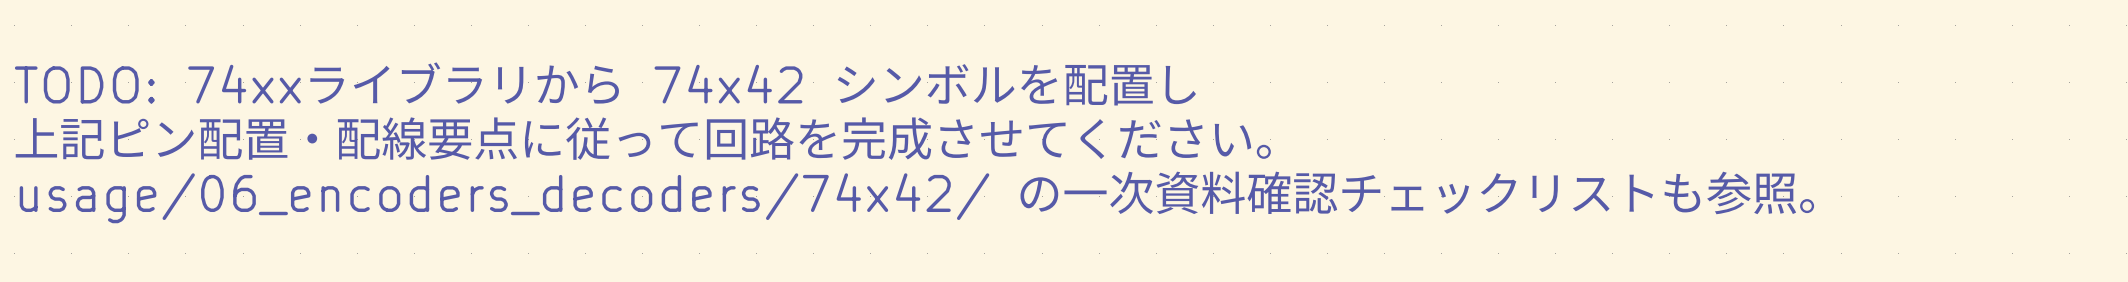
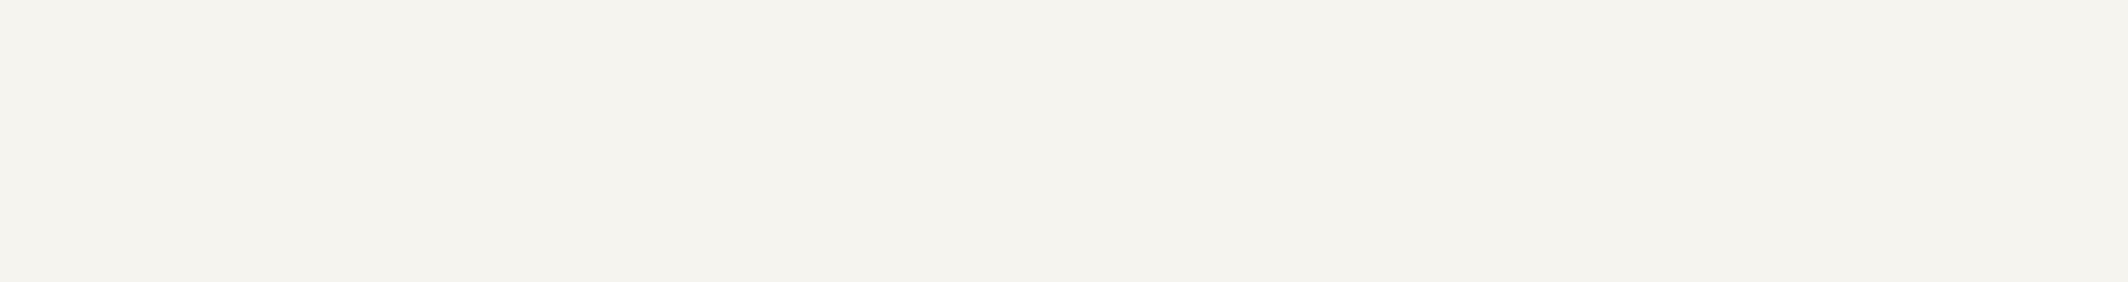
text: TODO: 74xxライブラリから 74x42 シンボルを配置し (606, 83) -> none
text: 上記ピン配置・配線要点に従って回路を完成させてください。 (643, 138) -> none
text: usage/06_encoders_decoders/74x42/ の一次資料確認チェックリストも参照。 (917, 196) -> none

